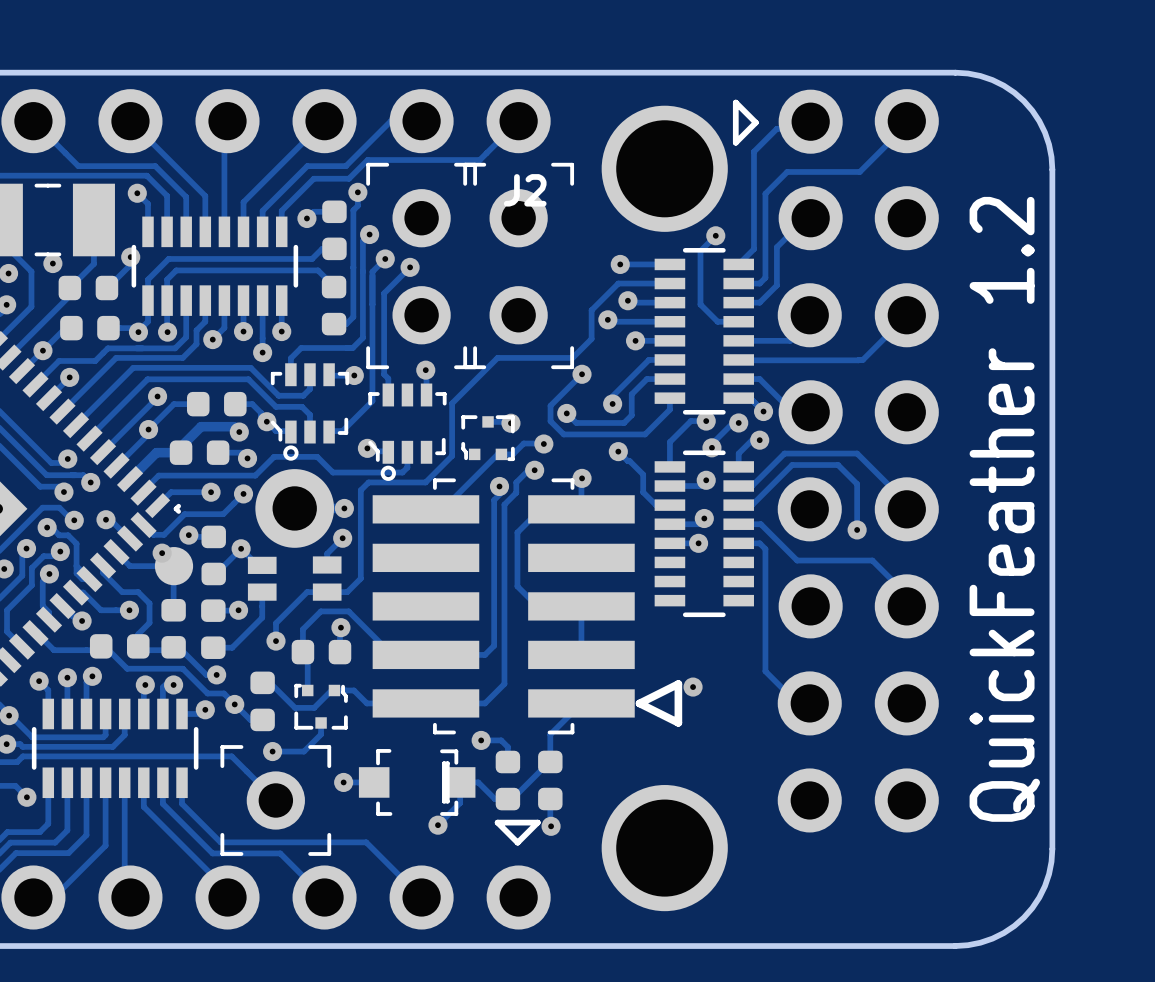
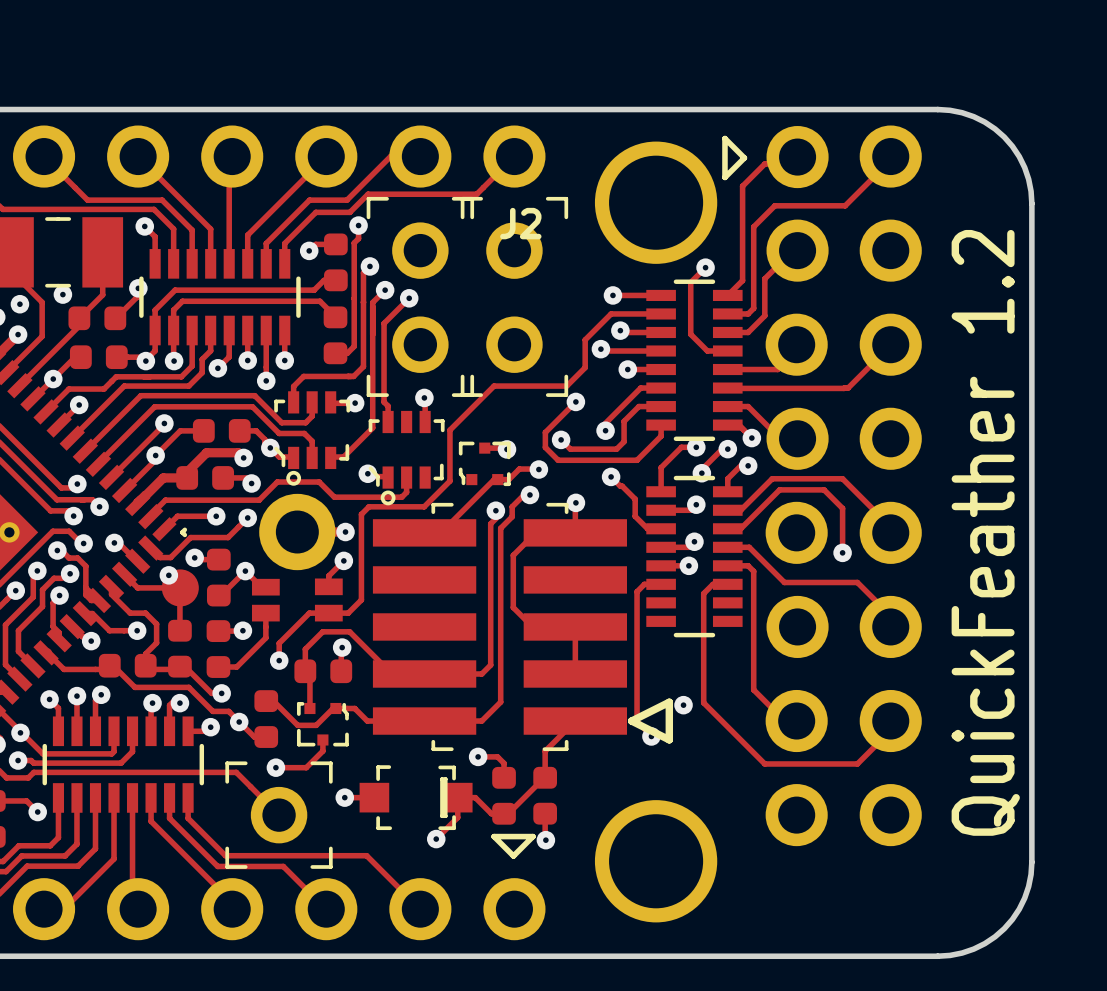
track: none -> (661, 584) (644, 584) (637, 591) (637, 721) (651, 735)
track: none -> (727, 584) (712, 584) (703, 593) (703, 702) (764, 763) (857, 763) (898, 723)
via: none -> (651, 736)

